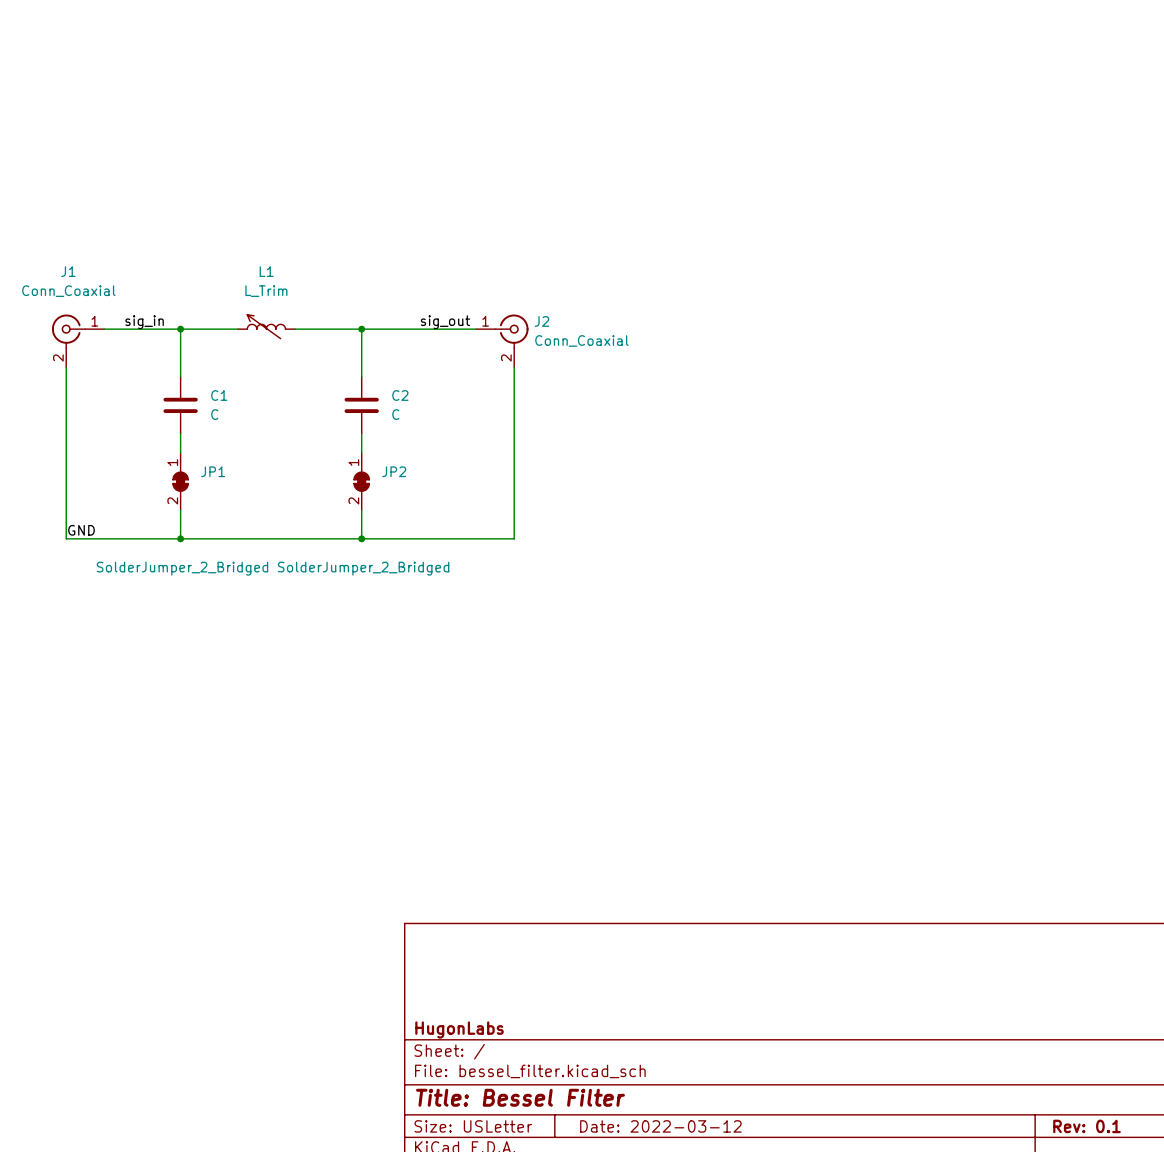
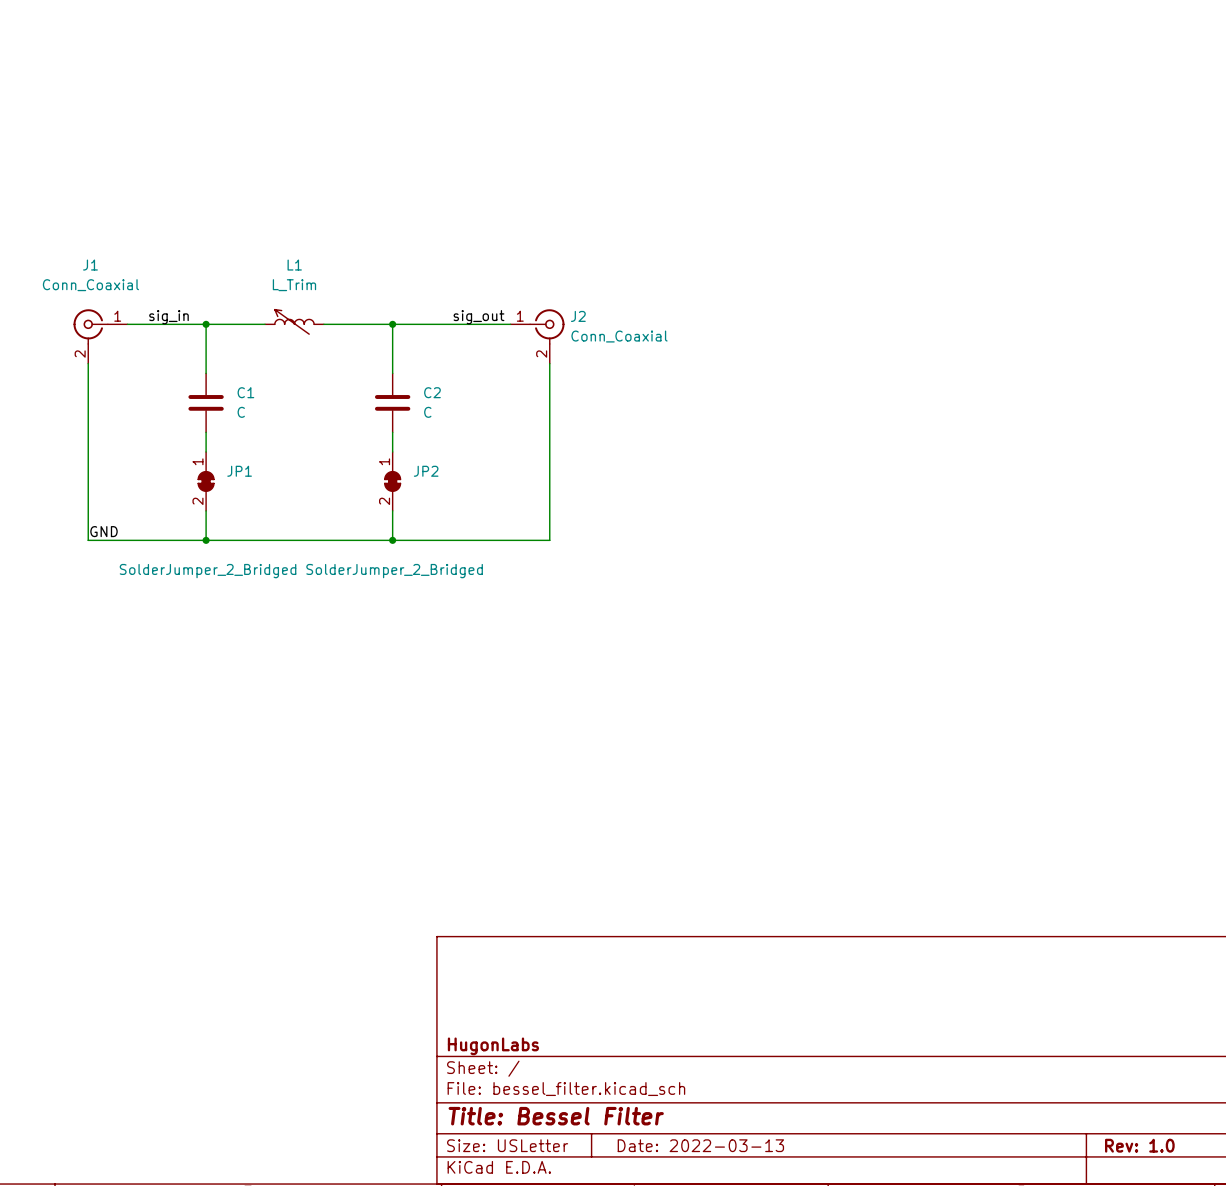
title block: Date: 2022-03-12 (660, 1126) -> Date: 2022-03-13 (700, 1145)
title block: Rev: 0.1 (1087, 1126) -> Rev: 1.0 (1139, 1145)

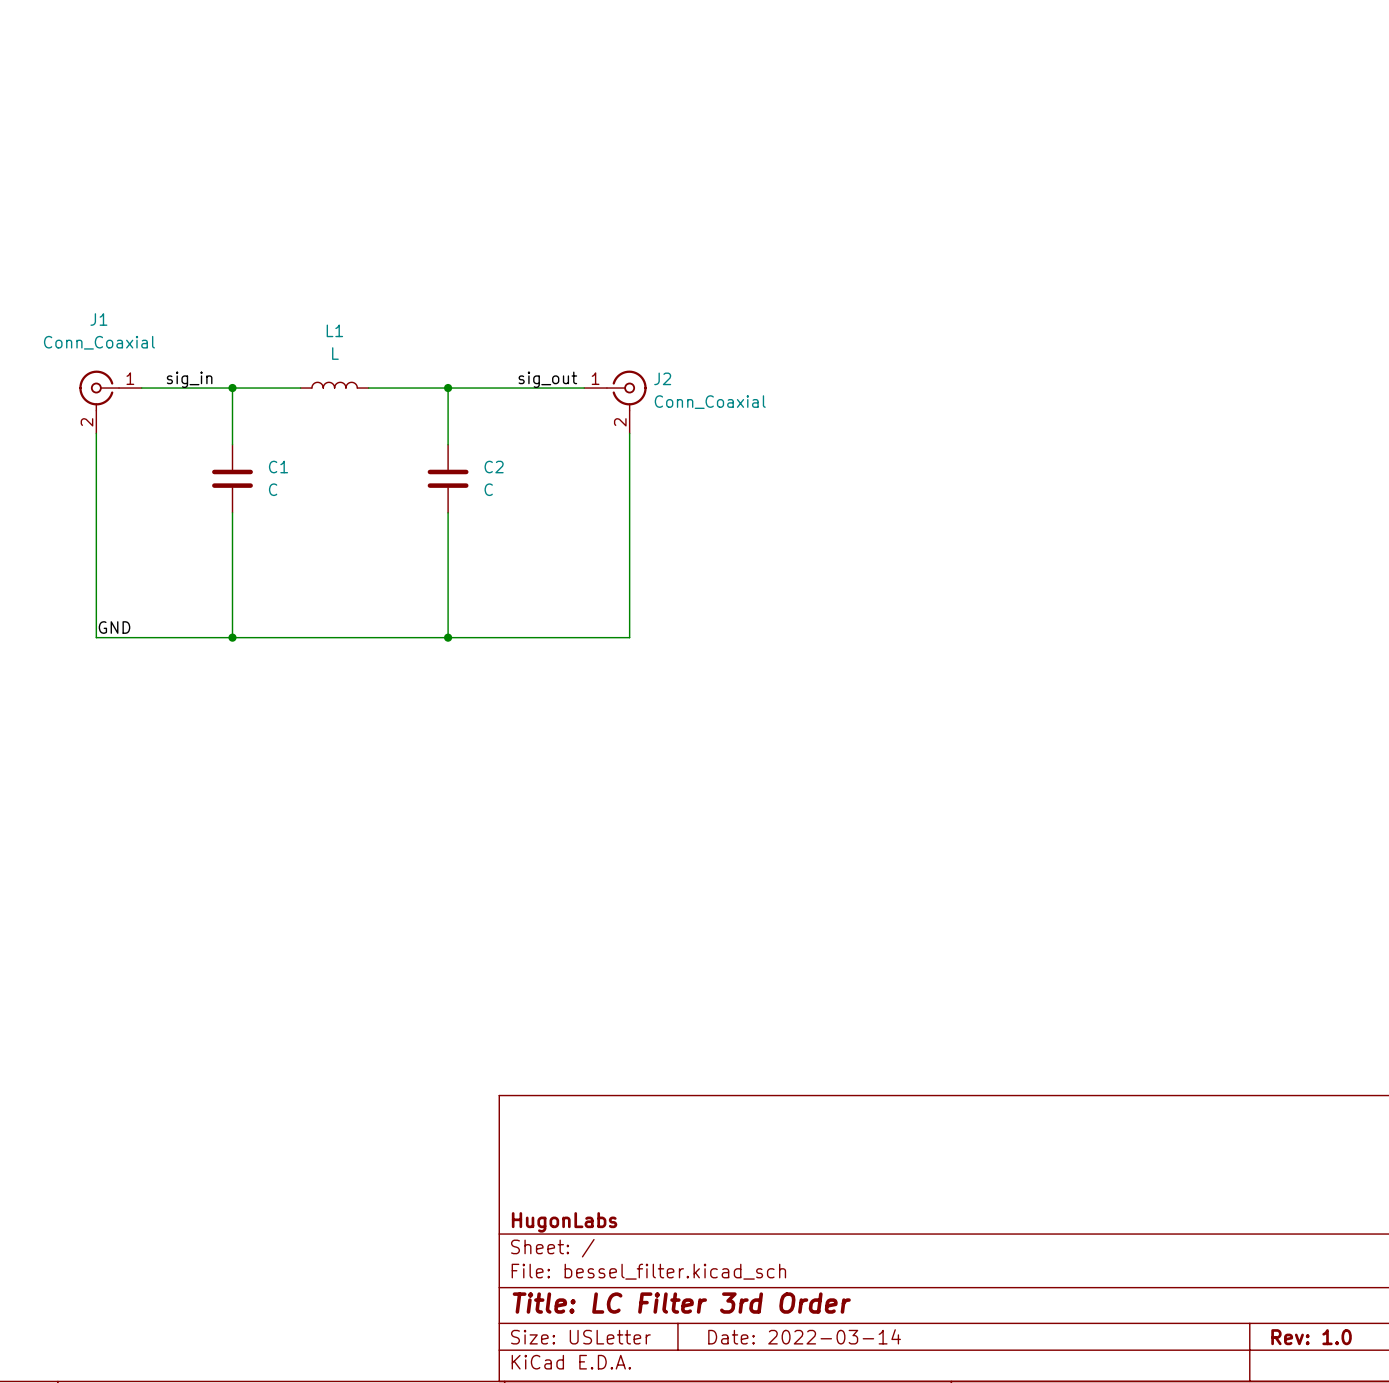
L1 value: L_Trim (294, 285) -> L (335, 353)
L1 symbol: [265, 309, 324, 335] -> [300, 382, 369, 389]
JP1: SolderJumper_2_Bridged (206, 481) -> none
JP2: SolderJumper_2_Bridged (392, 481) -> none
title block: Title: Bessel Filter (556, 1116) -> Title: LC Filter 3rd Order (681, 1303)
title block: Date: 2022-03-13 (700, 1145) -> Date: 2022-03-14 (804, 1336)

